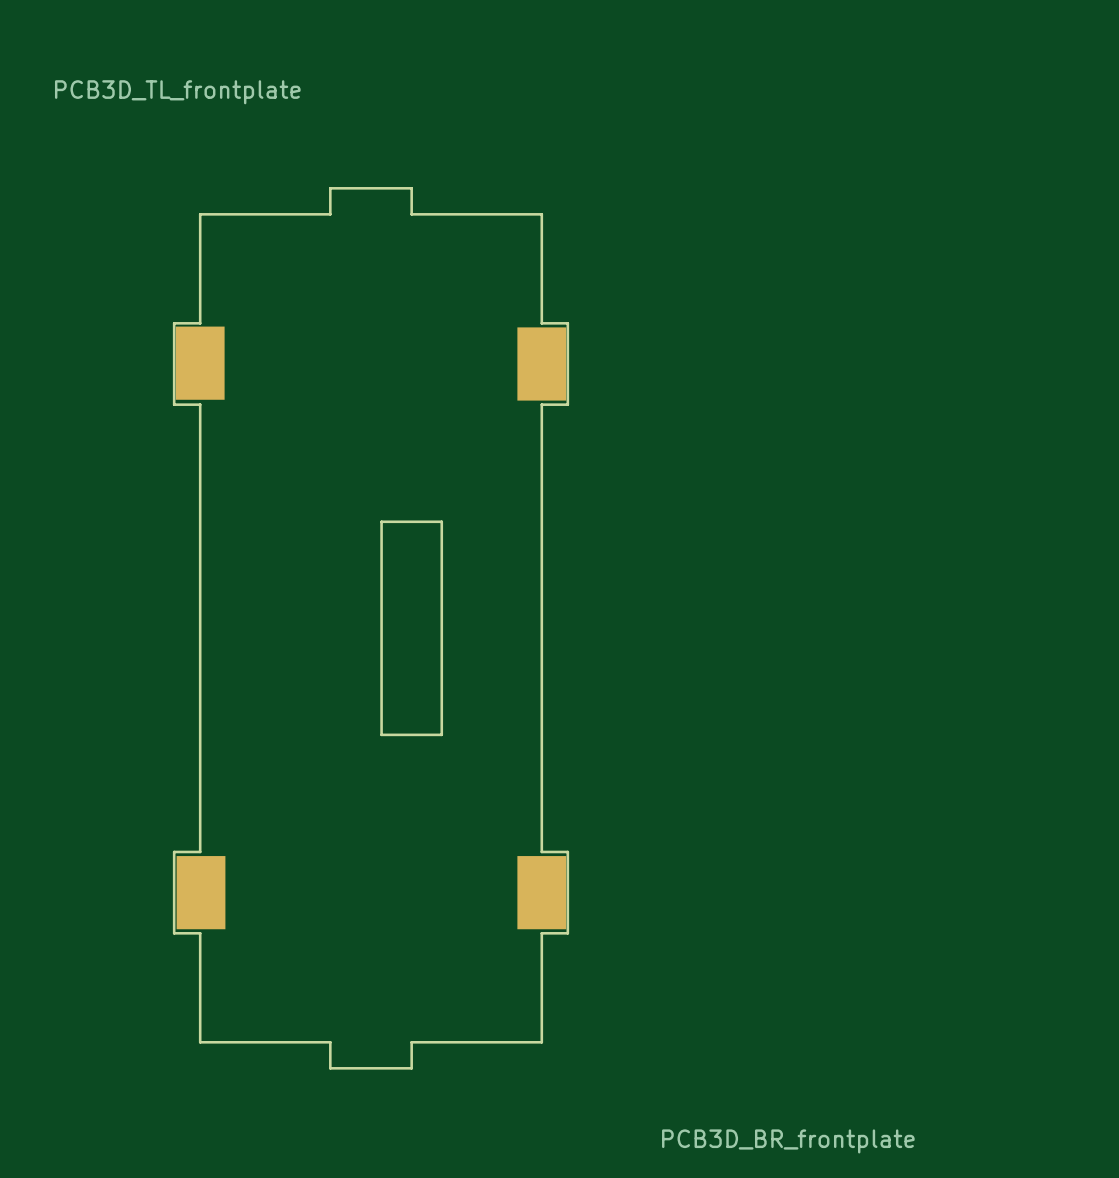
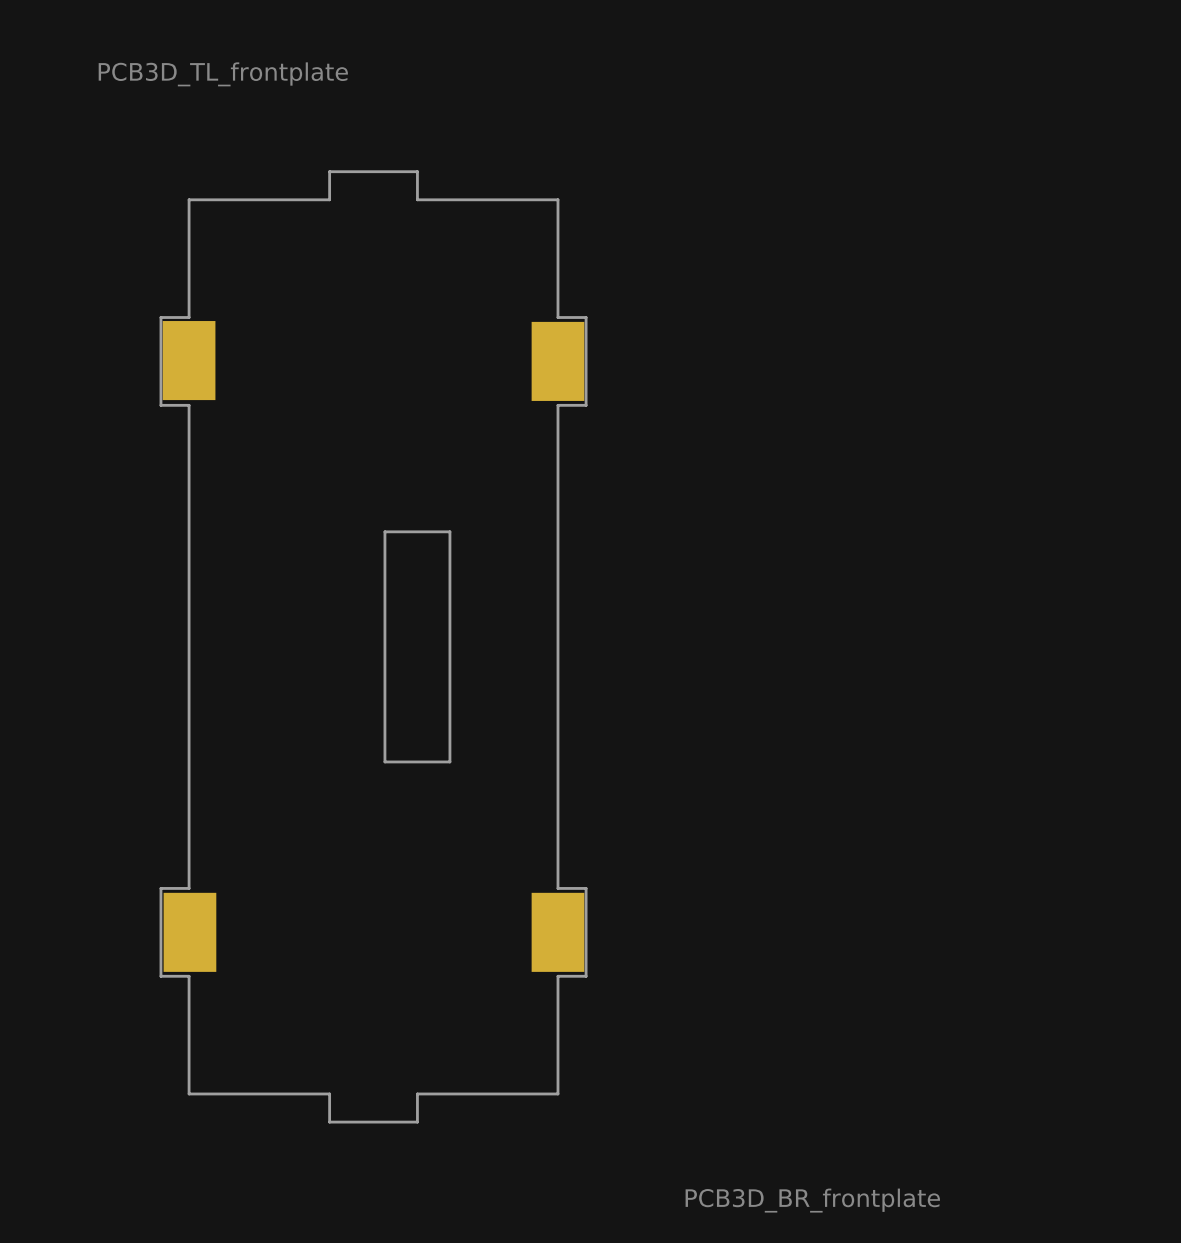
text position: PCB3D_TL_frontplate (177, 92) -> PCB3D_TL_frontplate (223, 74)

